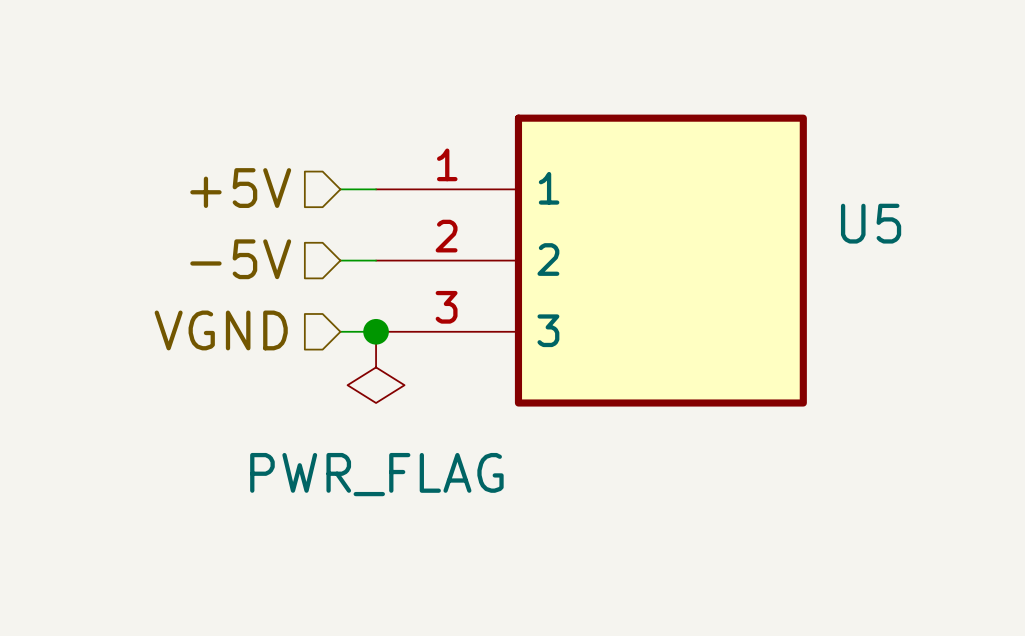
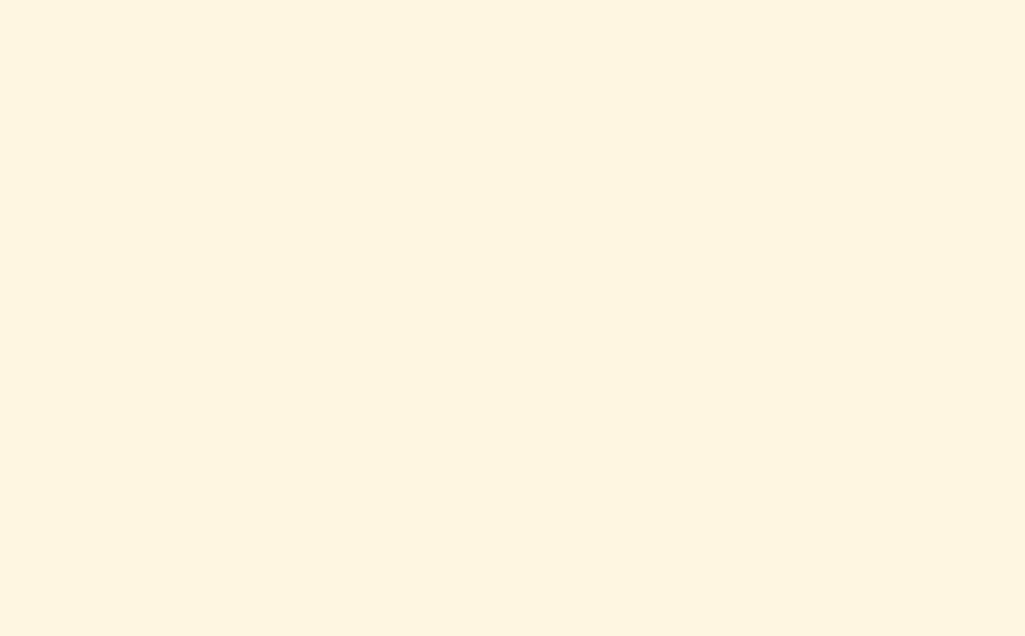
hierarchical label: +5V (240, 188) -> none
wire: (340, 189) (376, 189) -> none
hierarchical label: -5V (240, 259) -> none
wire: (340, 260) (376, 260) -> none
U5: (591, 260) -> none
hierarchical label: VGND (221, 330) -> none
wire: (340, 331) (376, 331) -> none
junction: (376, 331) -> none
power symbol: PWR_FLAG (376, 367) -> none

